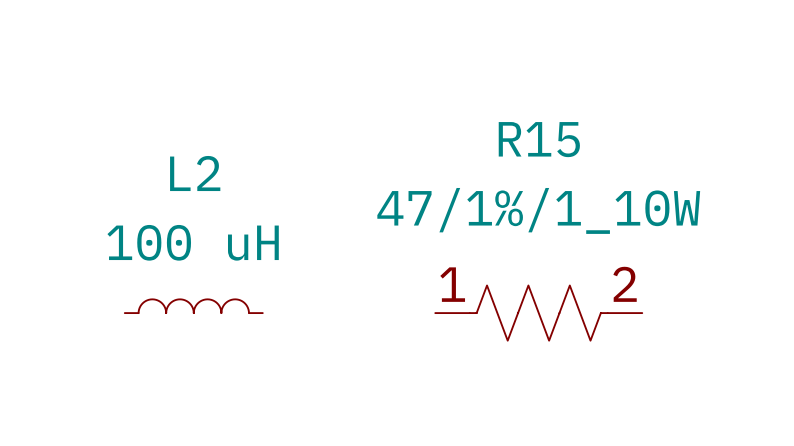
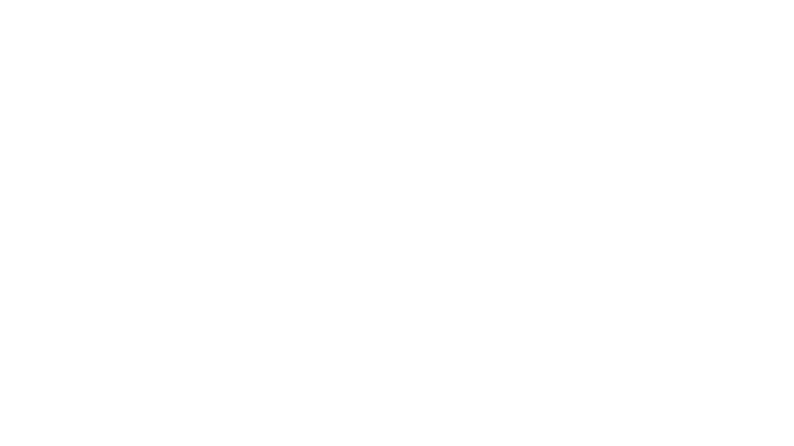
L2: 100 uH (193, 306) -> none
R15: 47/1%/1_10W (538, 313) -> none

